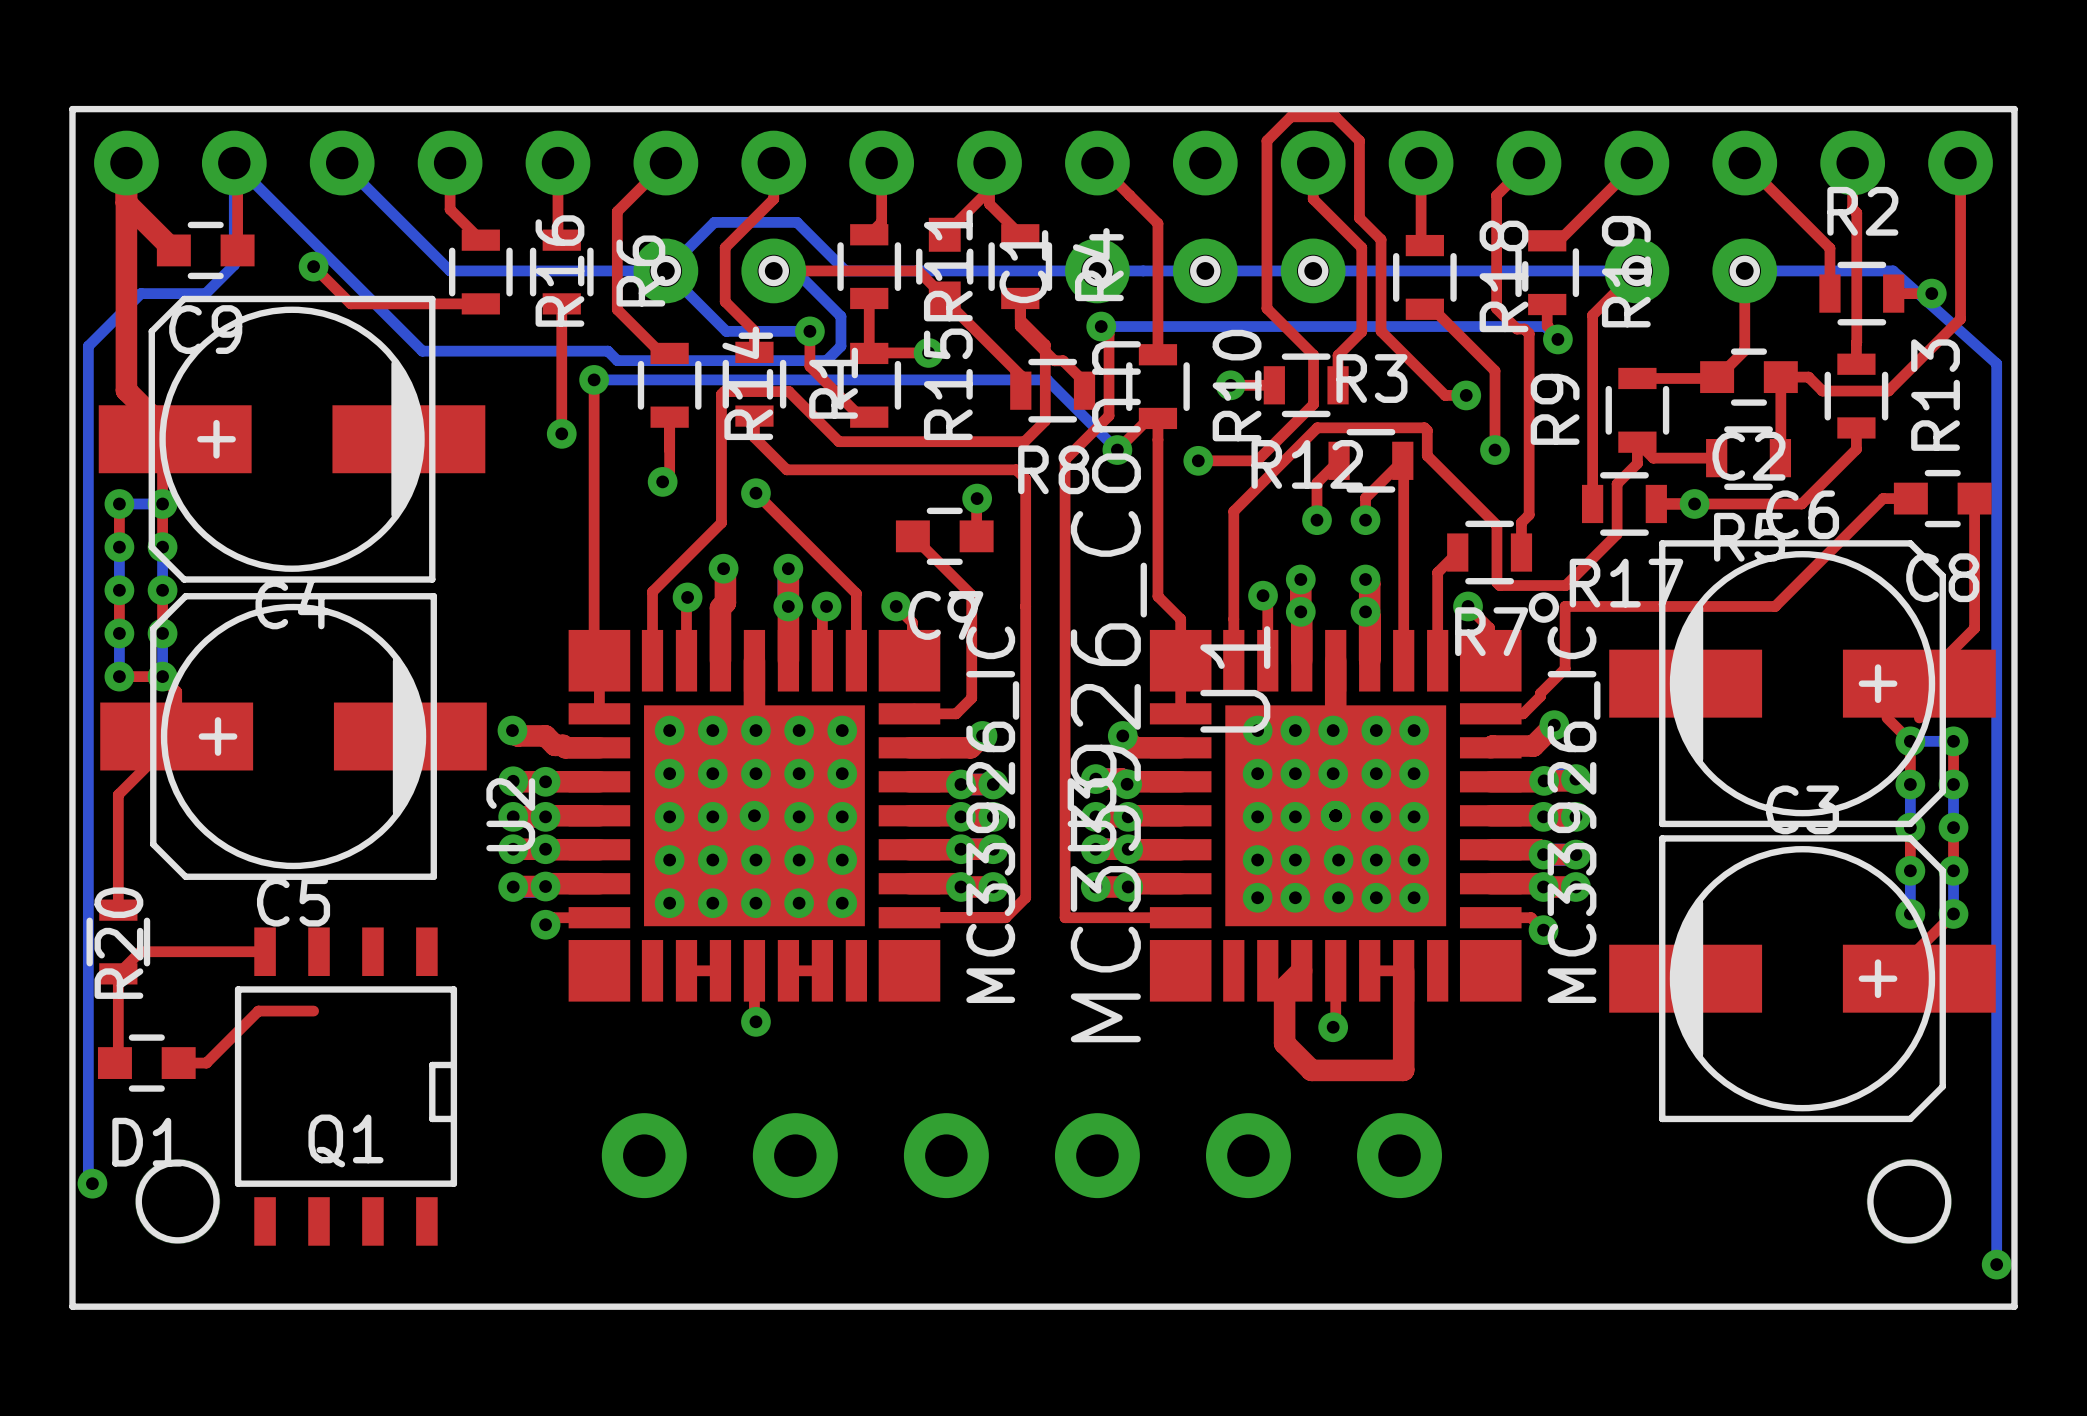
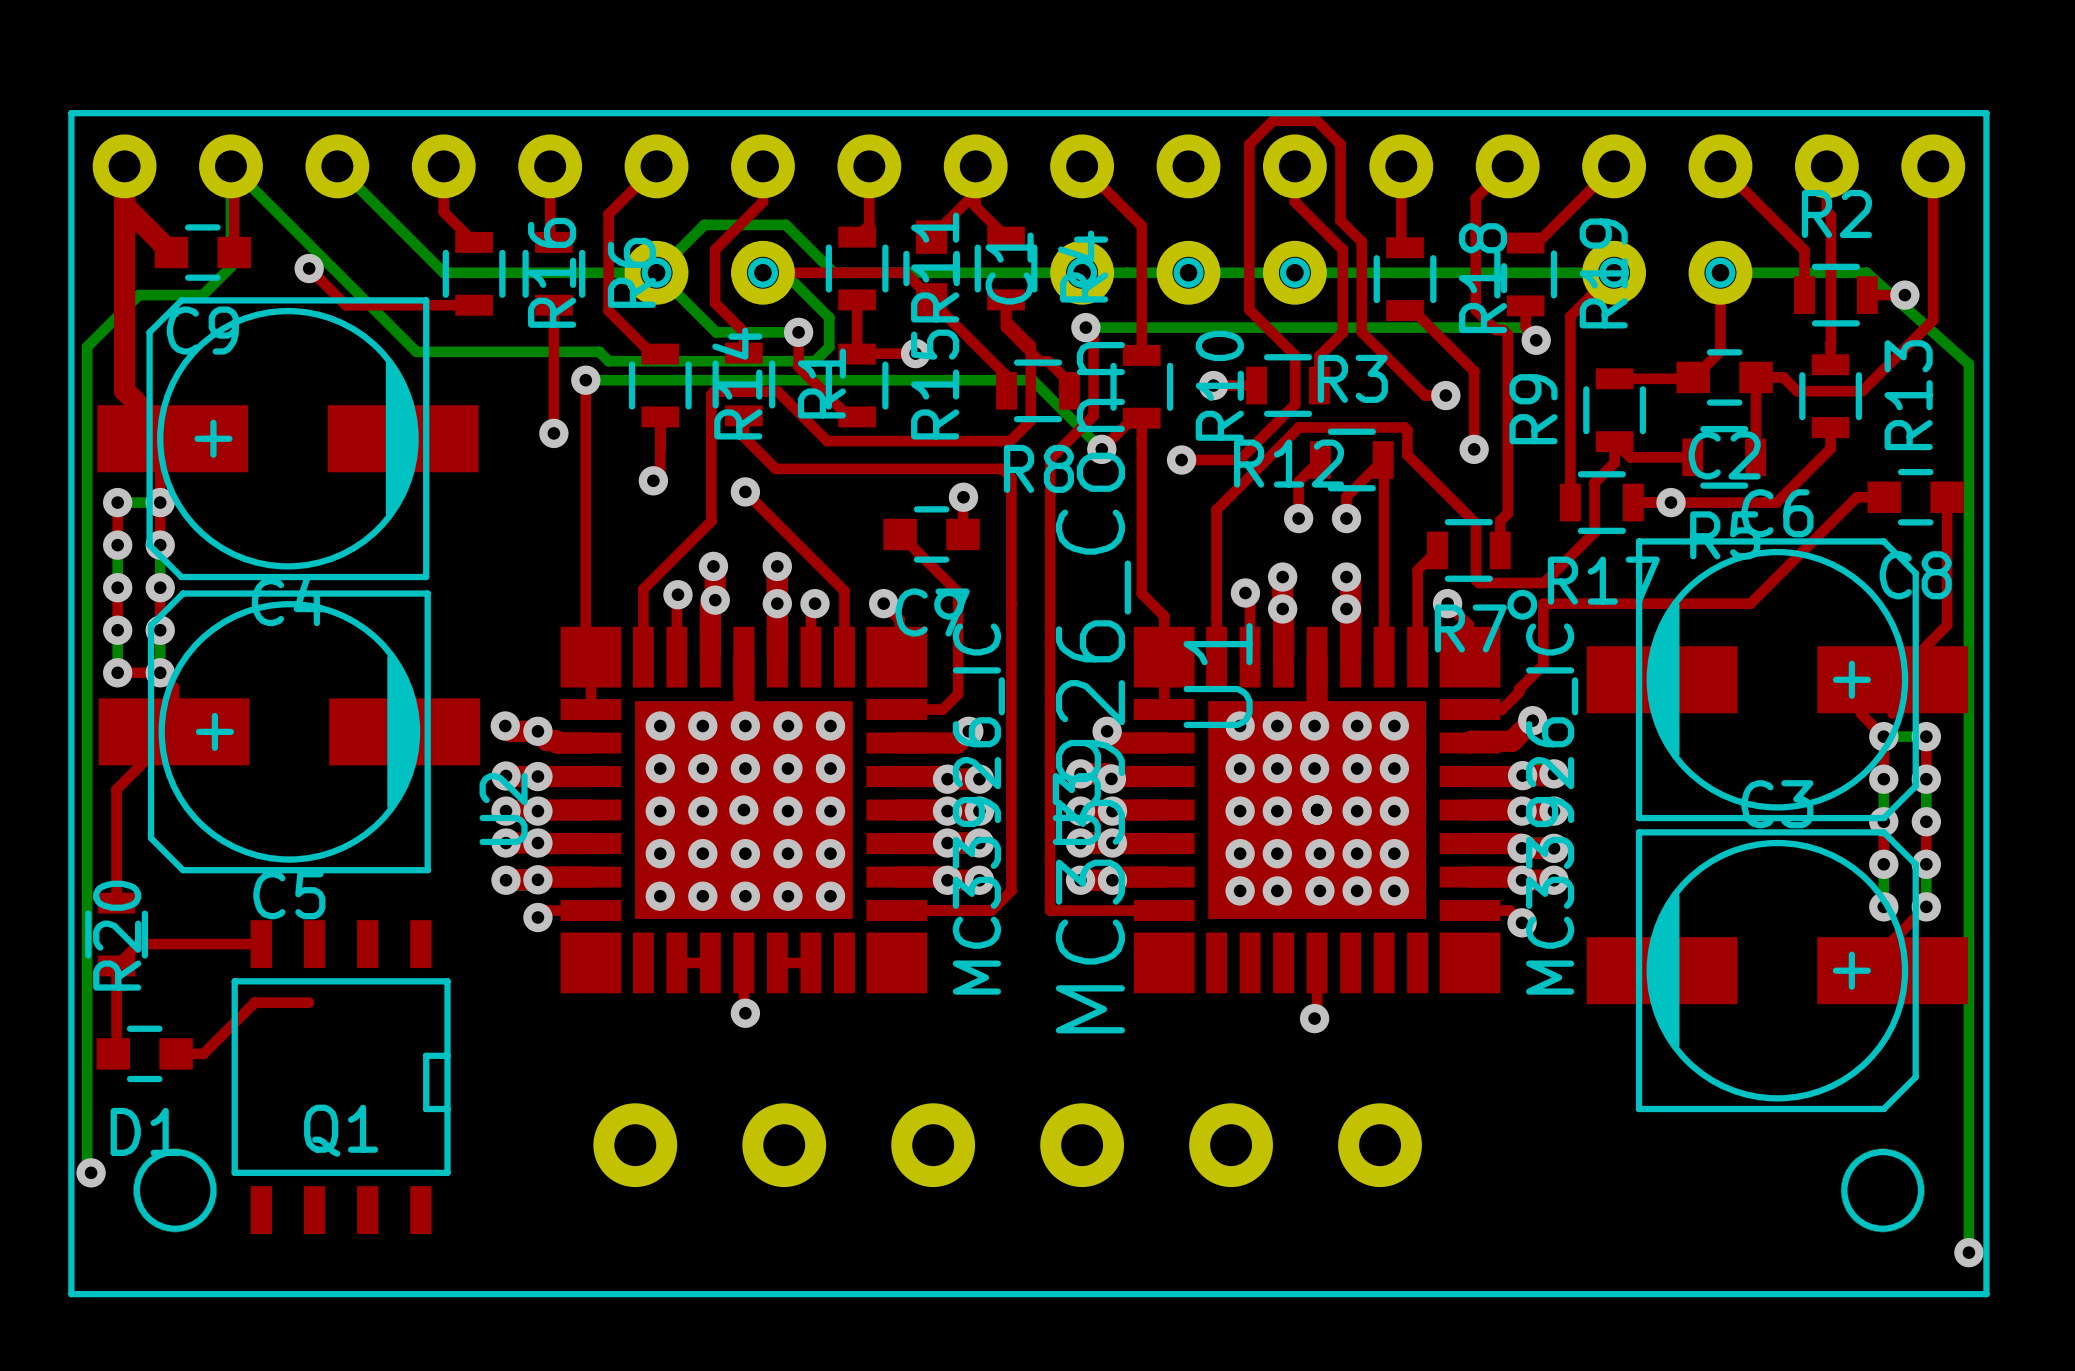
via: none -> (715, 600)
via: none -> (537, 731)
top track: (1301, 970) (1284, 987) (1284, 1043) (1311, 1070) (1403, 1070) -> none
top track: (1369, 970) (1403, 970) (1403, 1070) -> none

